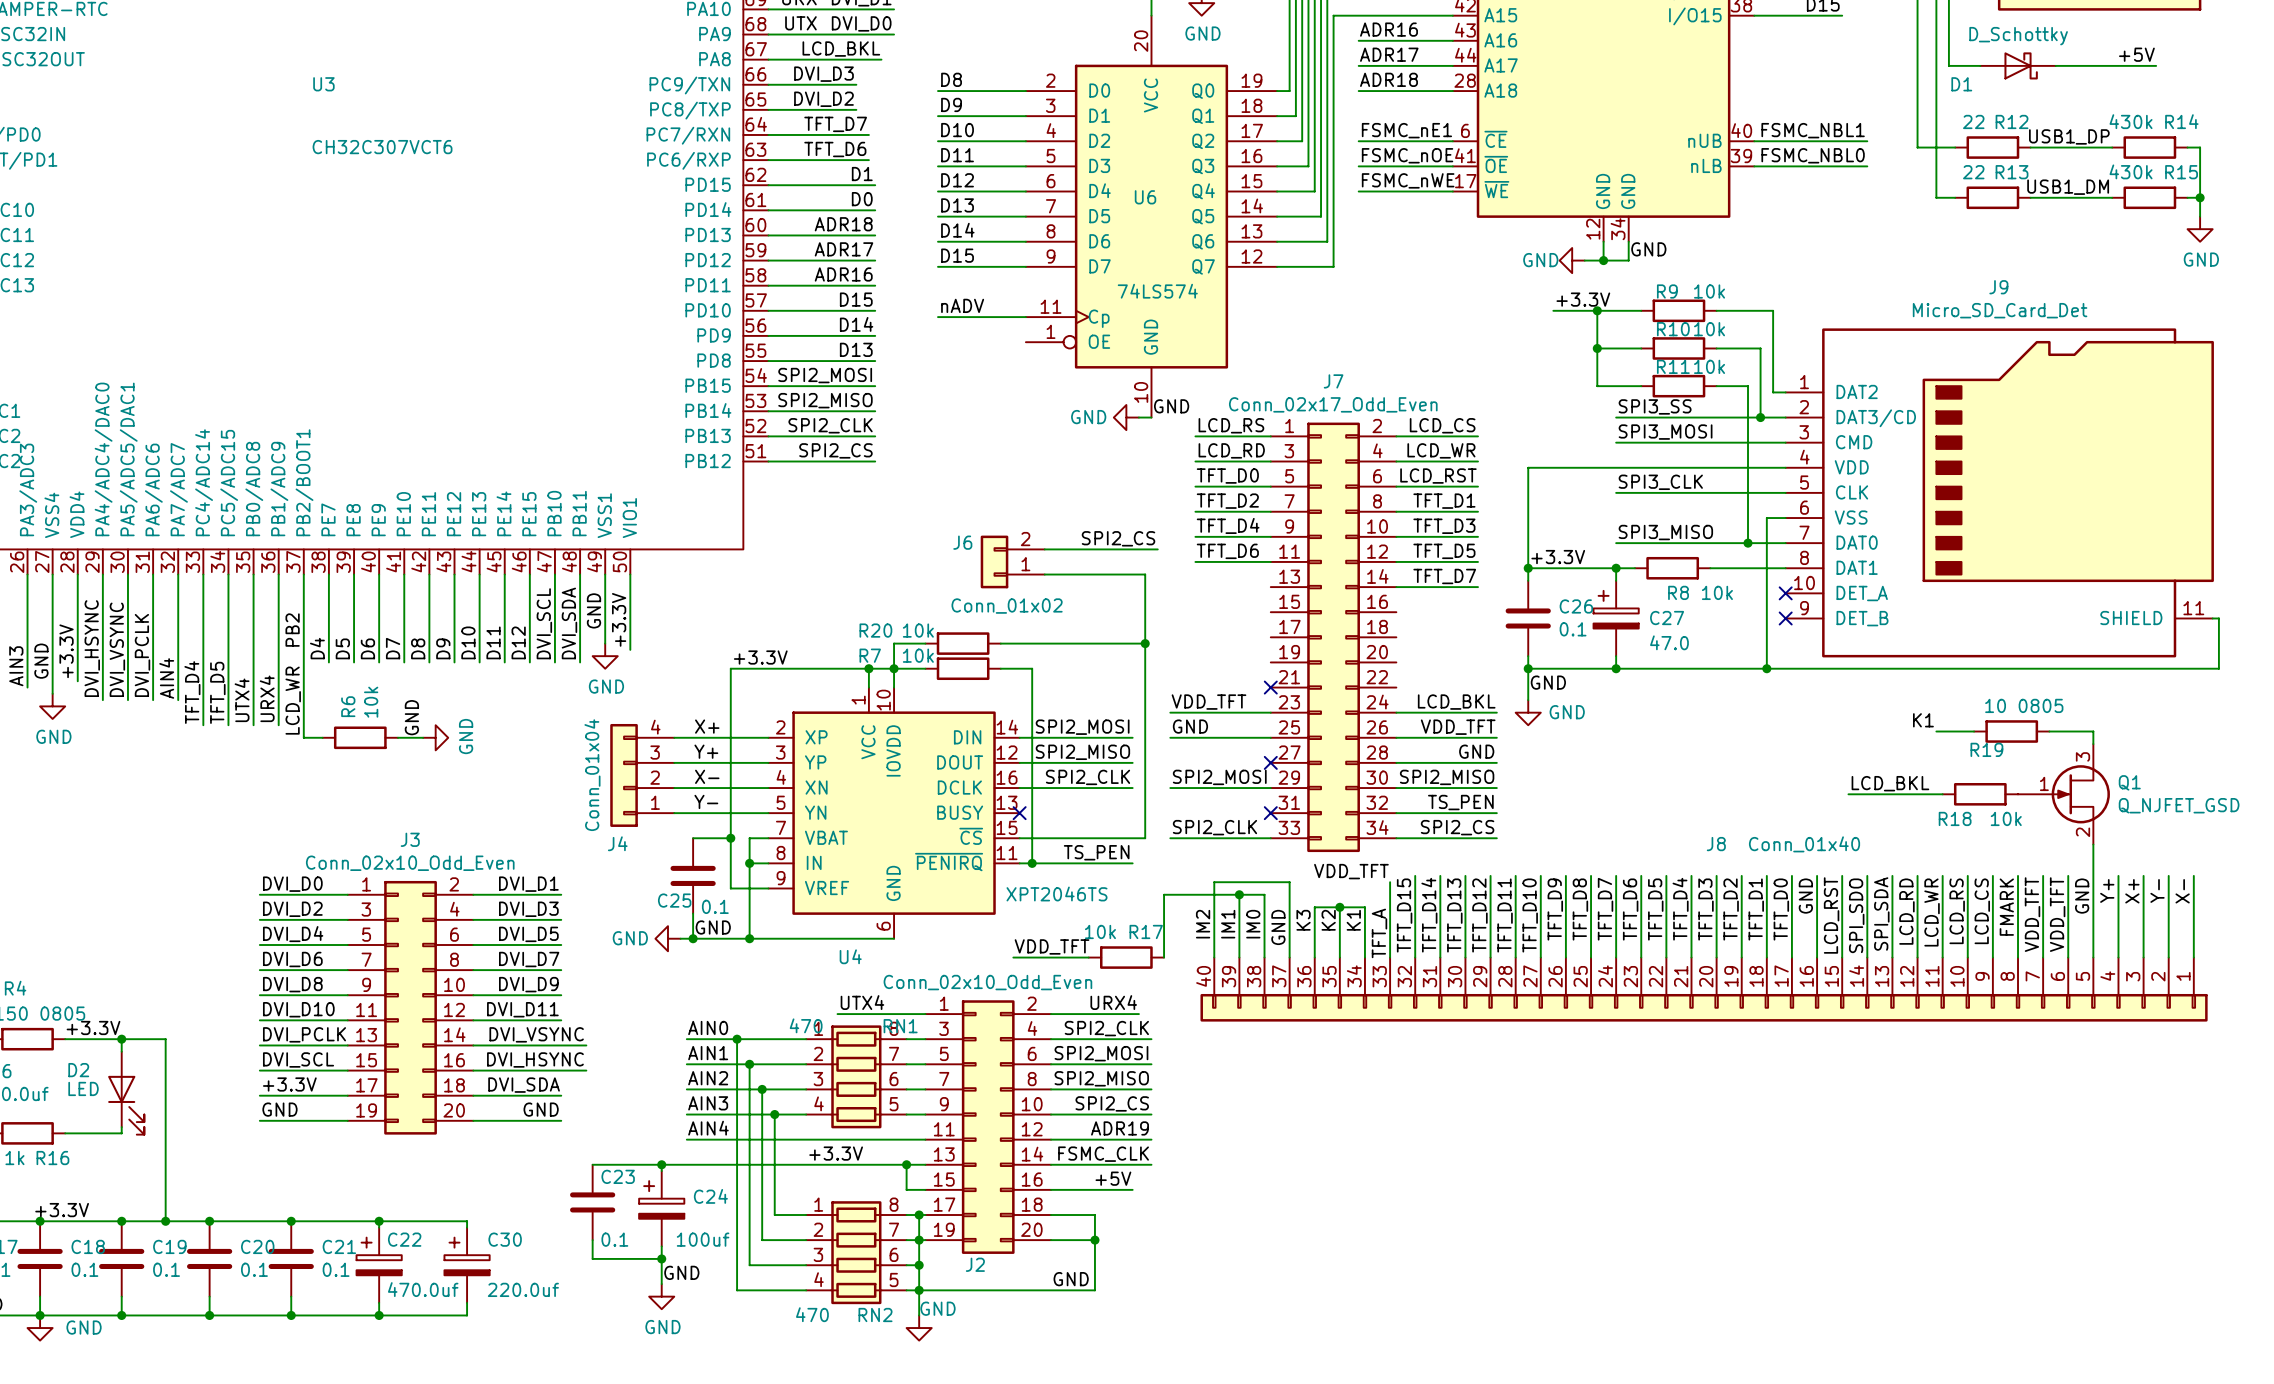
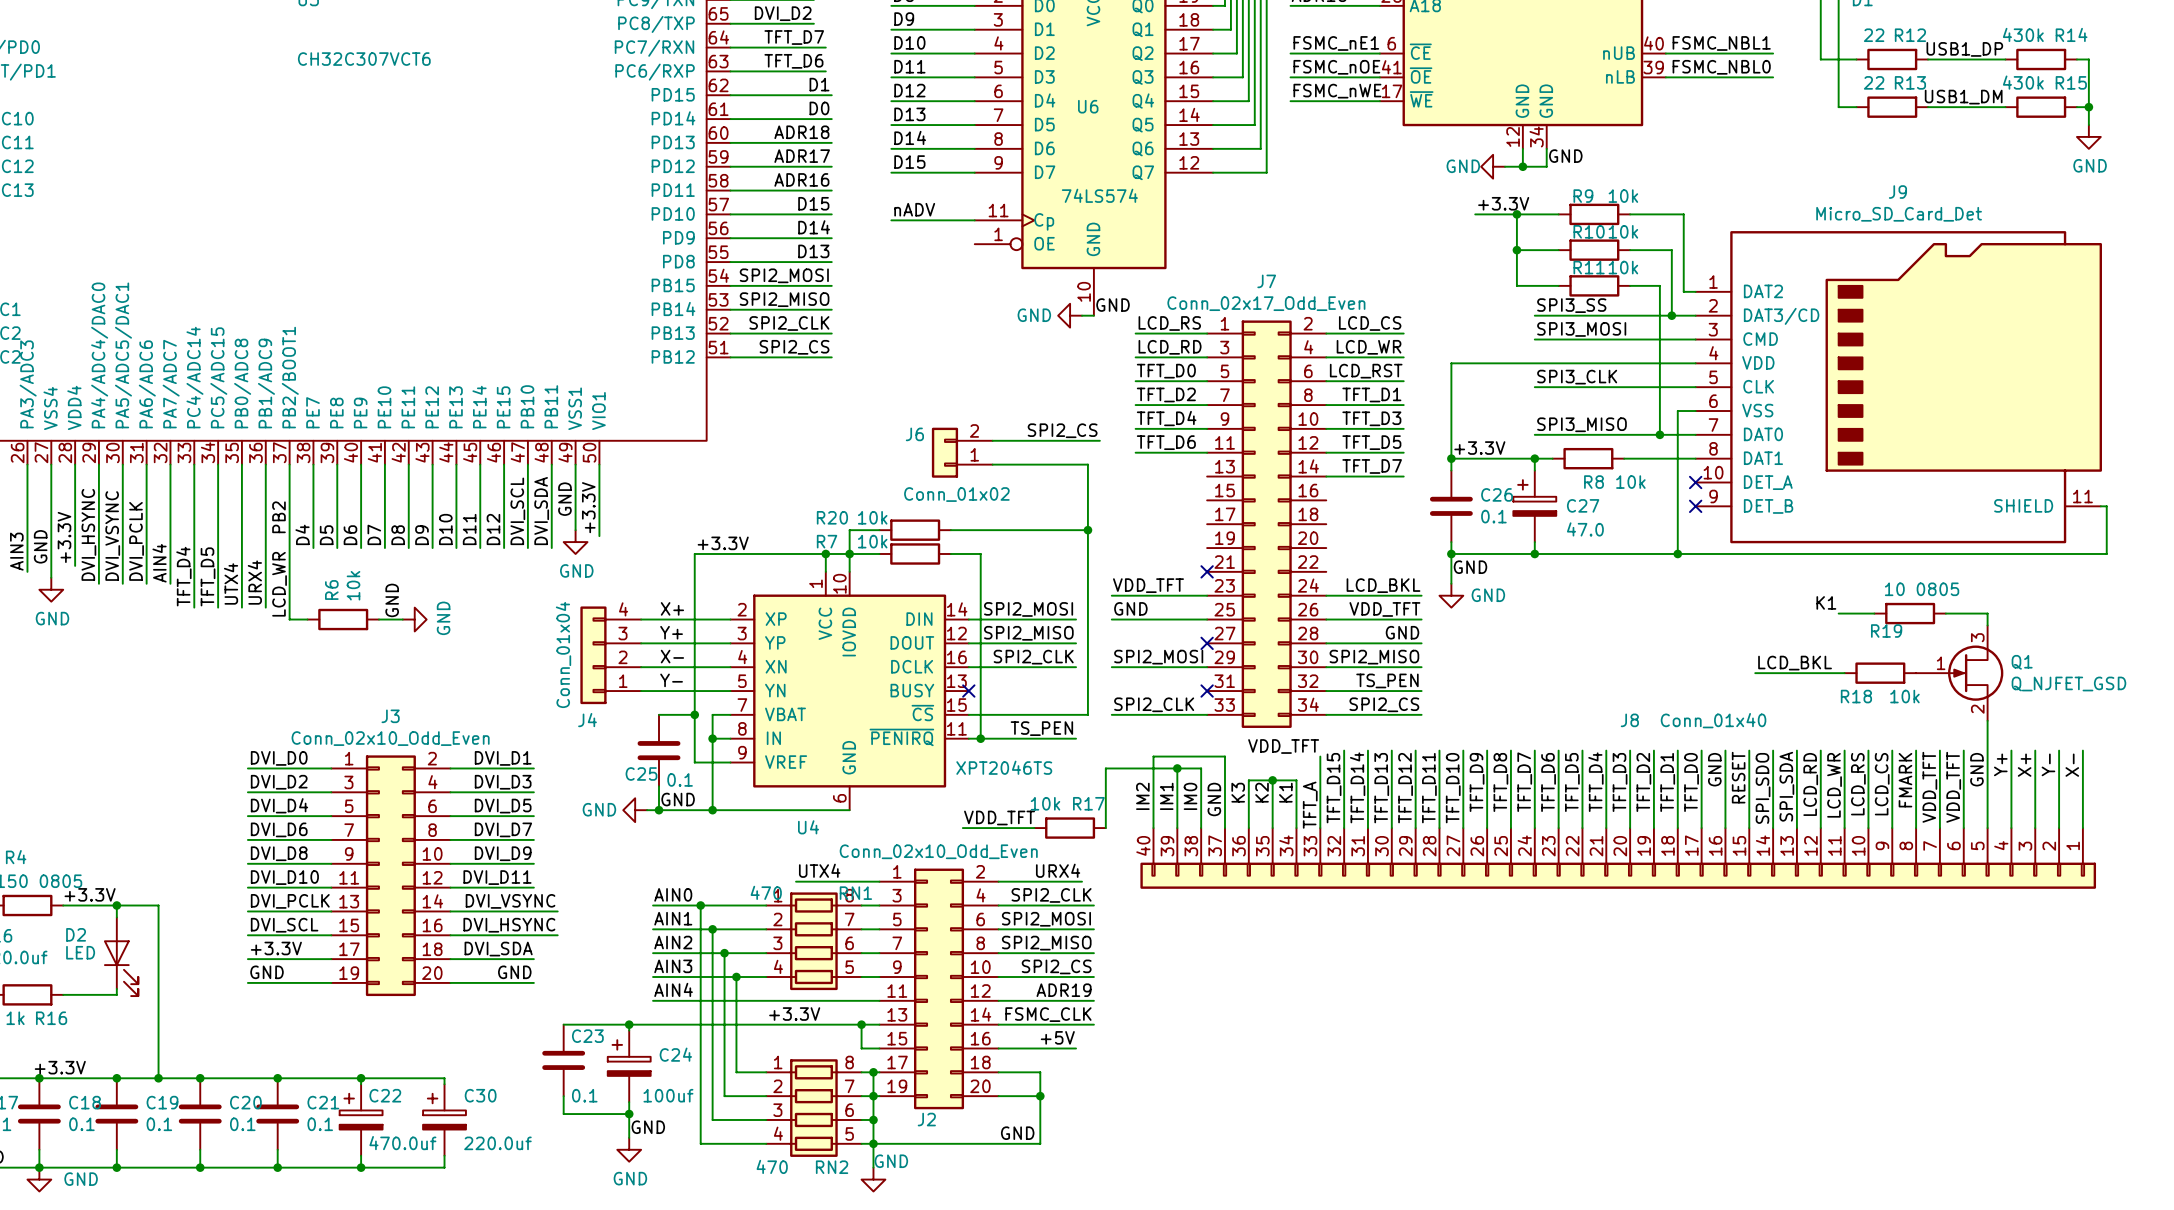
label: LCD_RST (1831, 915) -> RESET (1738, 777)

